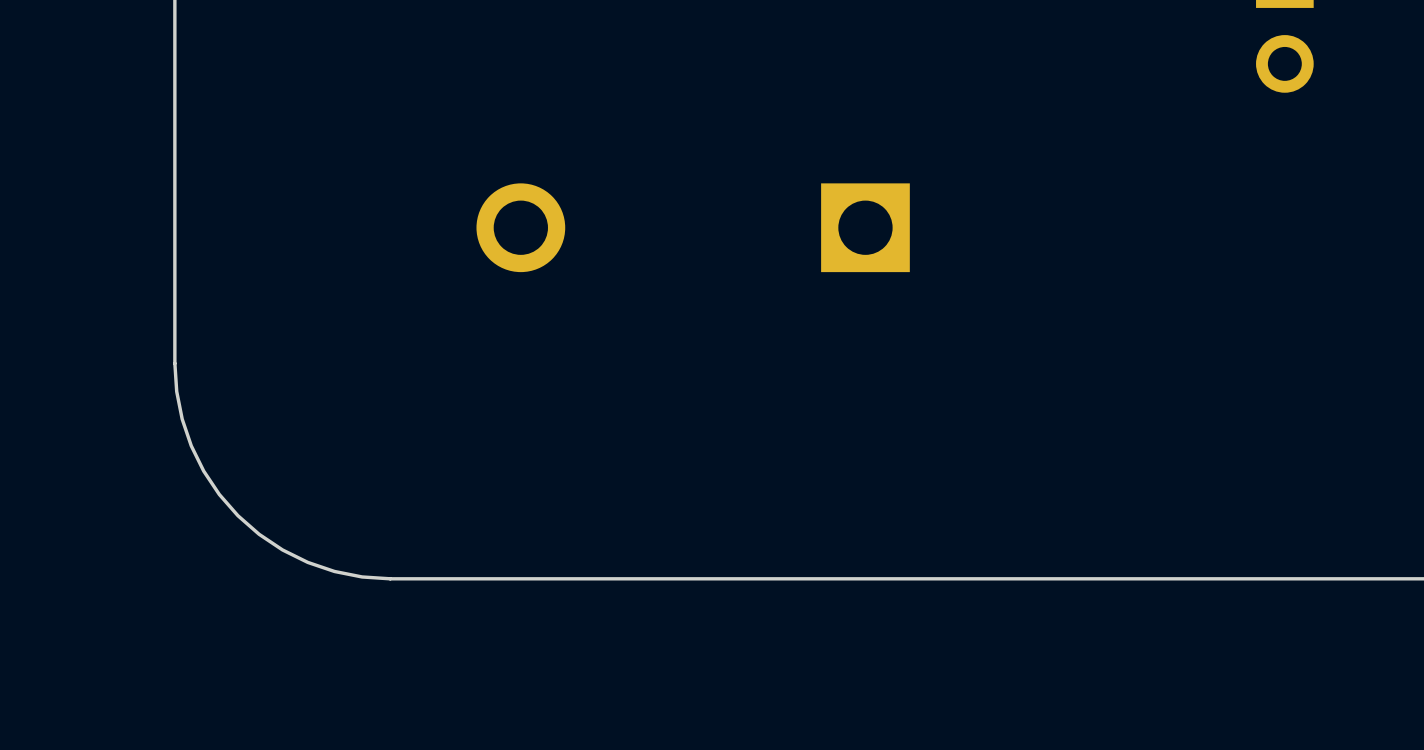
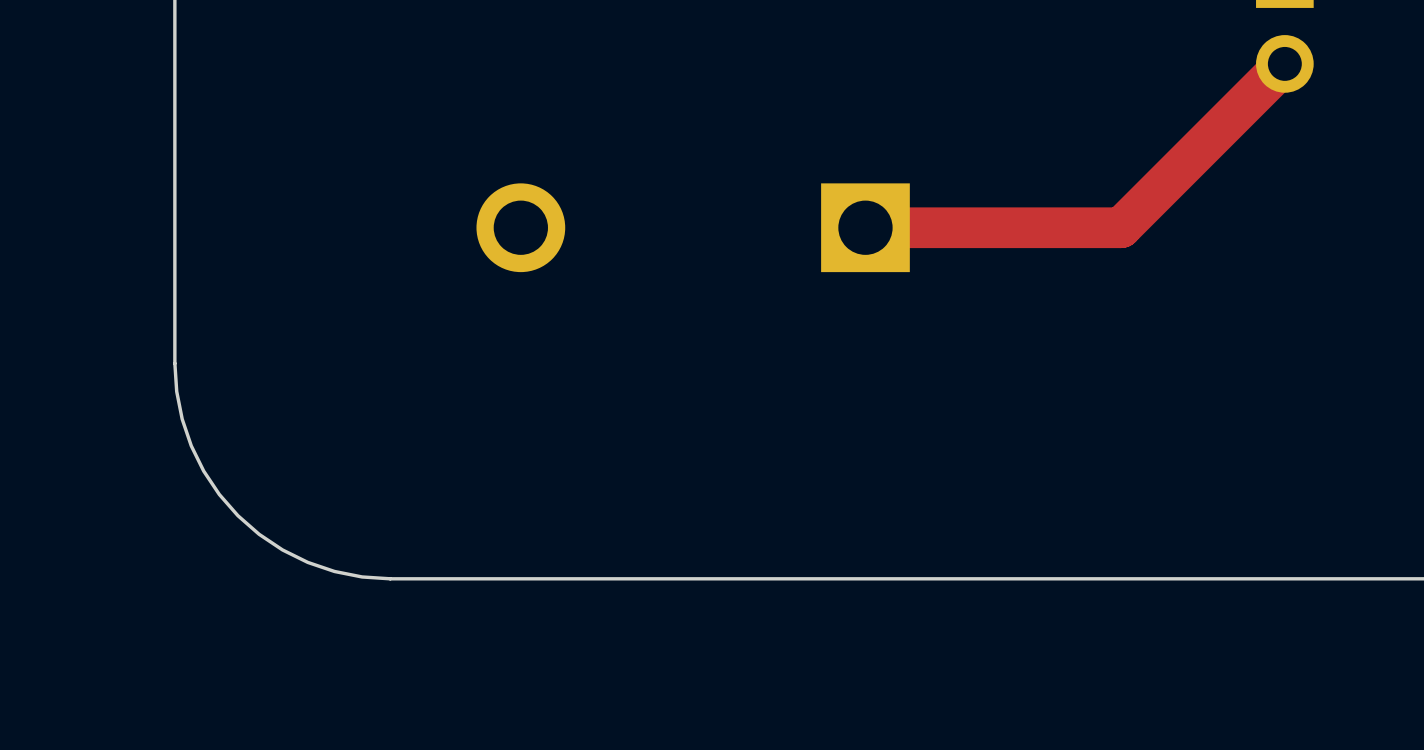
track: none -> (1284, 63) (1121, 227) (865, 227)

